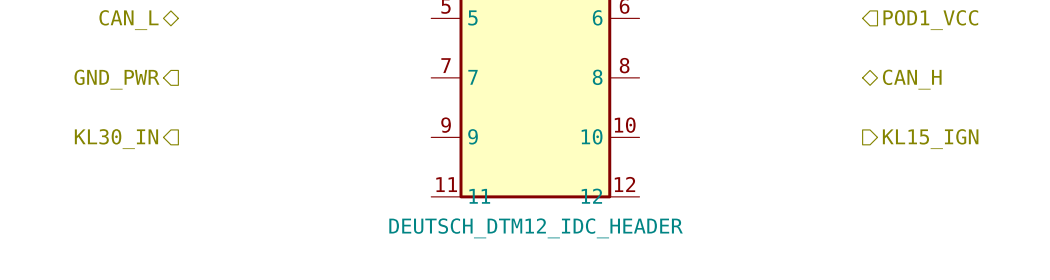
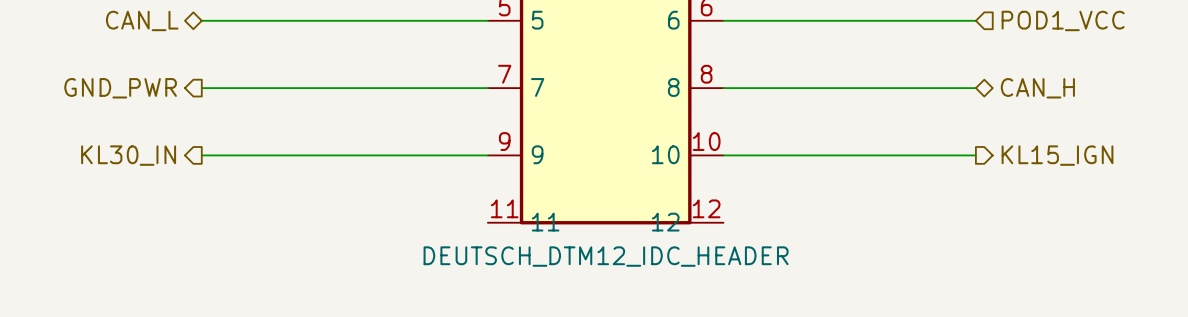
wire: none -> (201, 20) (487, 20)
wire: none -> (723, 20) (975, 20)
wire: none -> (201, 88) (487, 88)
wire: none -> (723, 88) (975, 88)
wire: none -> (201, 155) (487, 155)
wire: none -> (723, 155) (975, 155)

